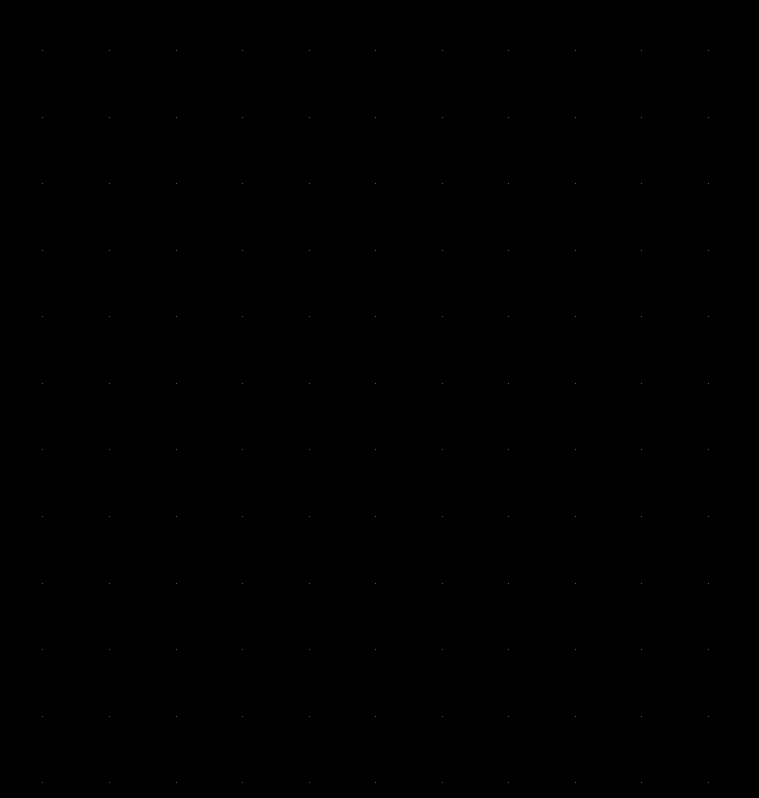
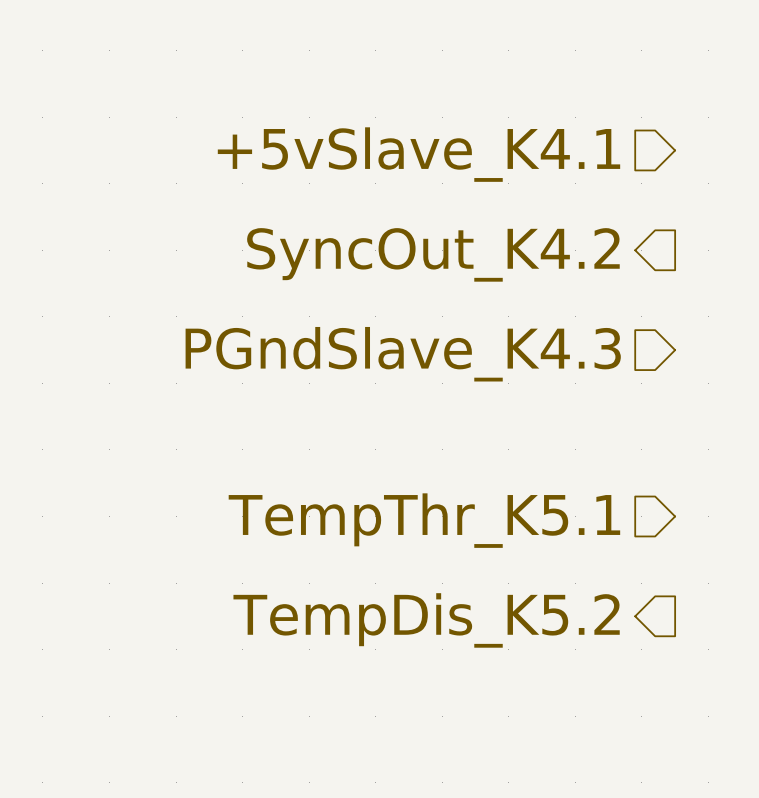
hierarchical label: none -> +5vSlave_K4.1 (418, 154)
hierarchical label: none -> SyncOut_K4.2 (433, 254)
hierarchical label: none -> PGndSlave_K4.3 (403, 354)
hierarchical label: none -> TempThr_K5.1 (424, 520)
hierarchical label: none -> TempDis_K5.2 (426, 620)

